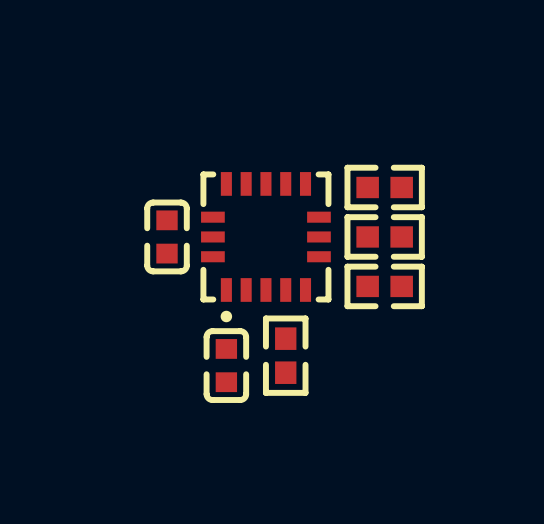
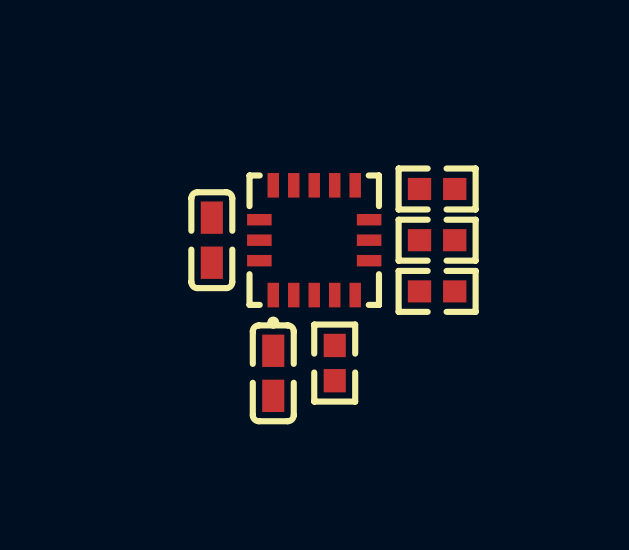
part footprint: [144, 199, 190, 275] -> [188, 189, 236, 292]
part footprint: [203, 328, 250, 403] -> [249, 322, 297, 425]

